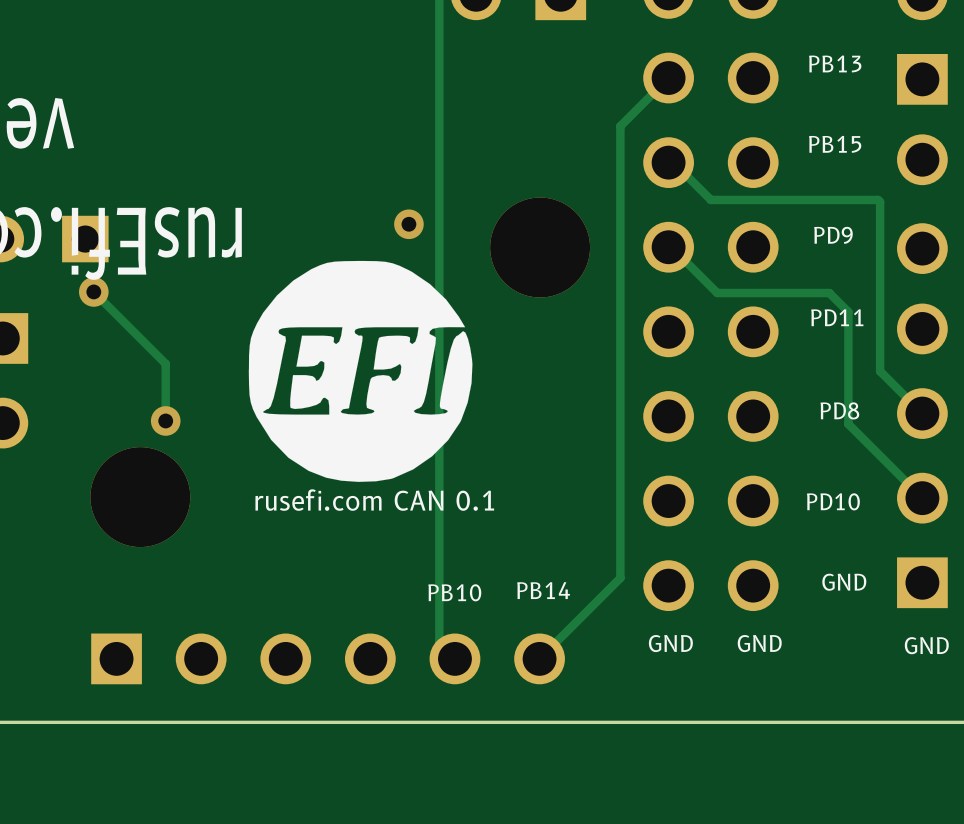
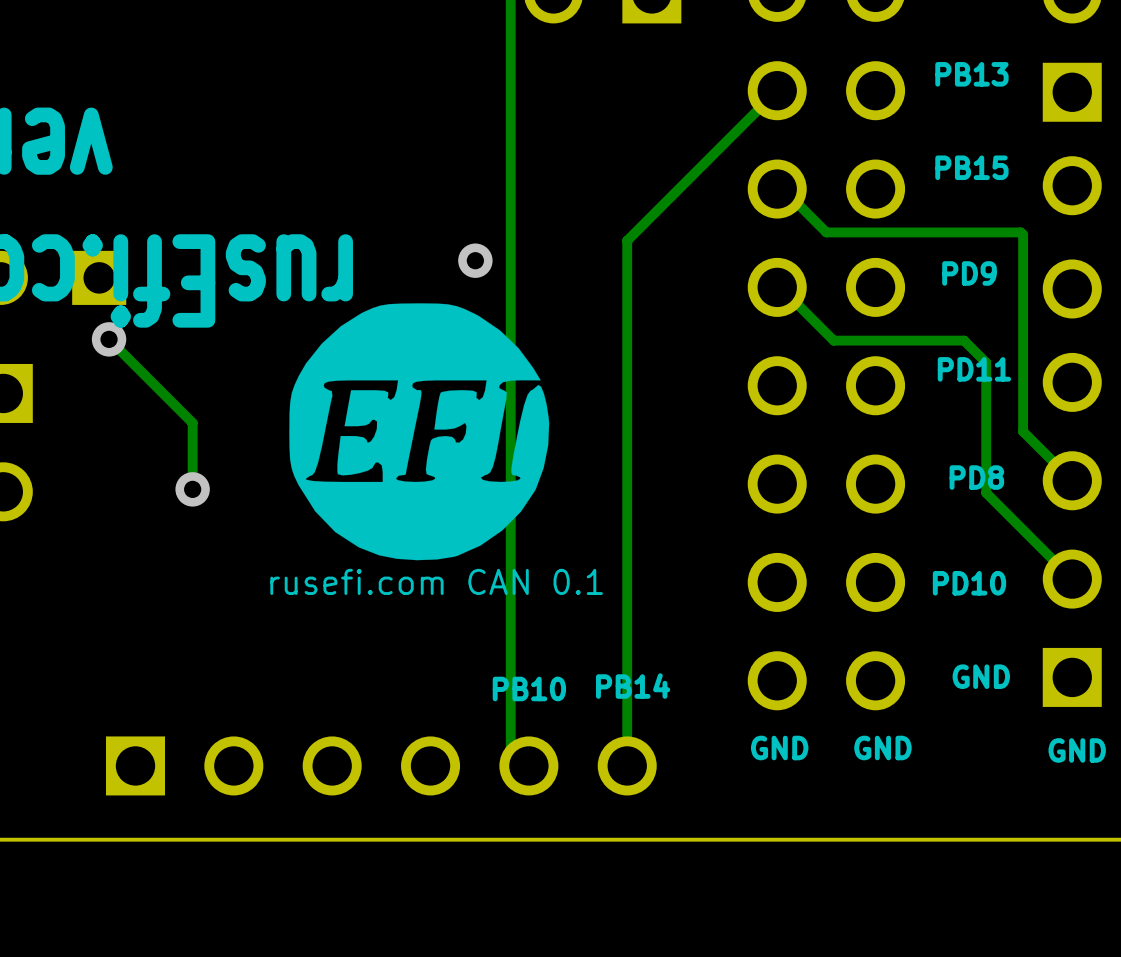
track: (620, 126) (620, 578) (539, 658) -> (721, 146) (627, 240) (627, 765)
part: (540, 247) -> none
part: (140, 497) -> none

